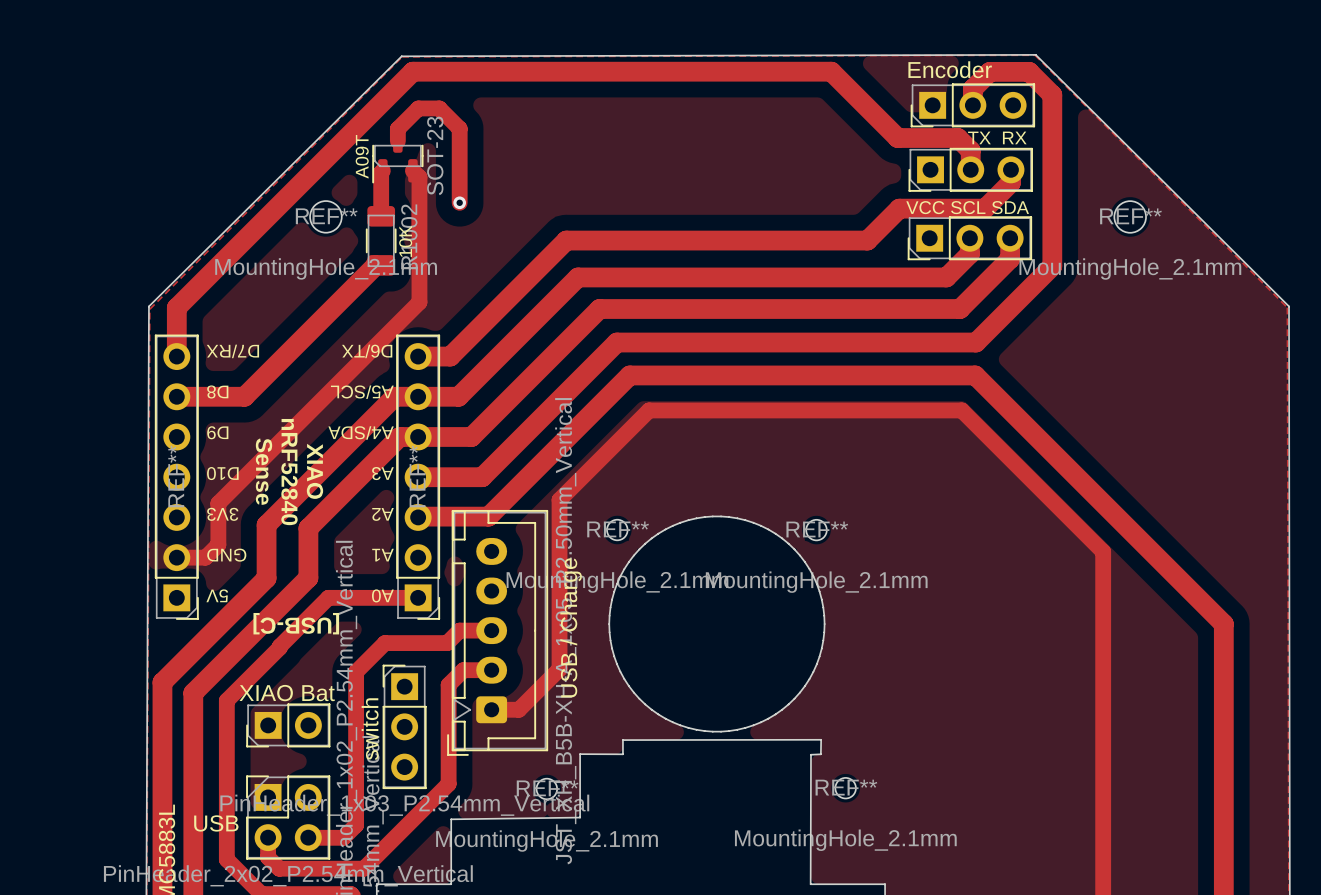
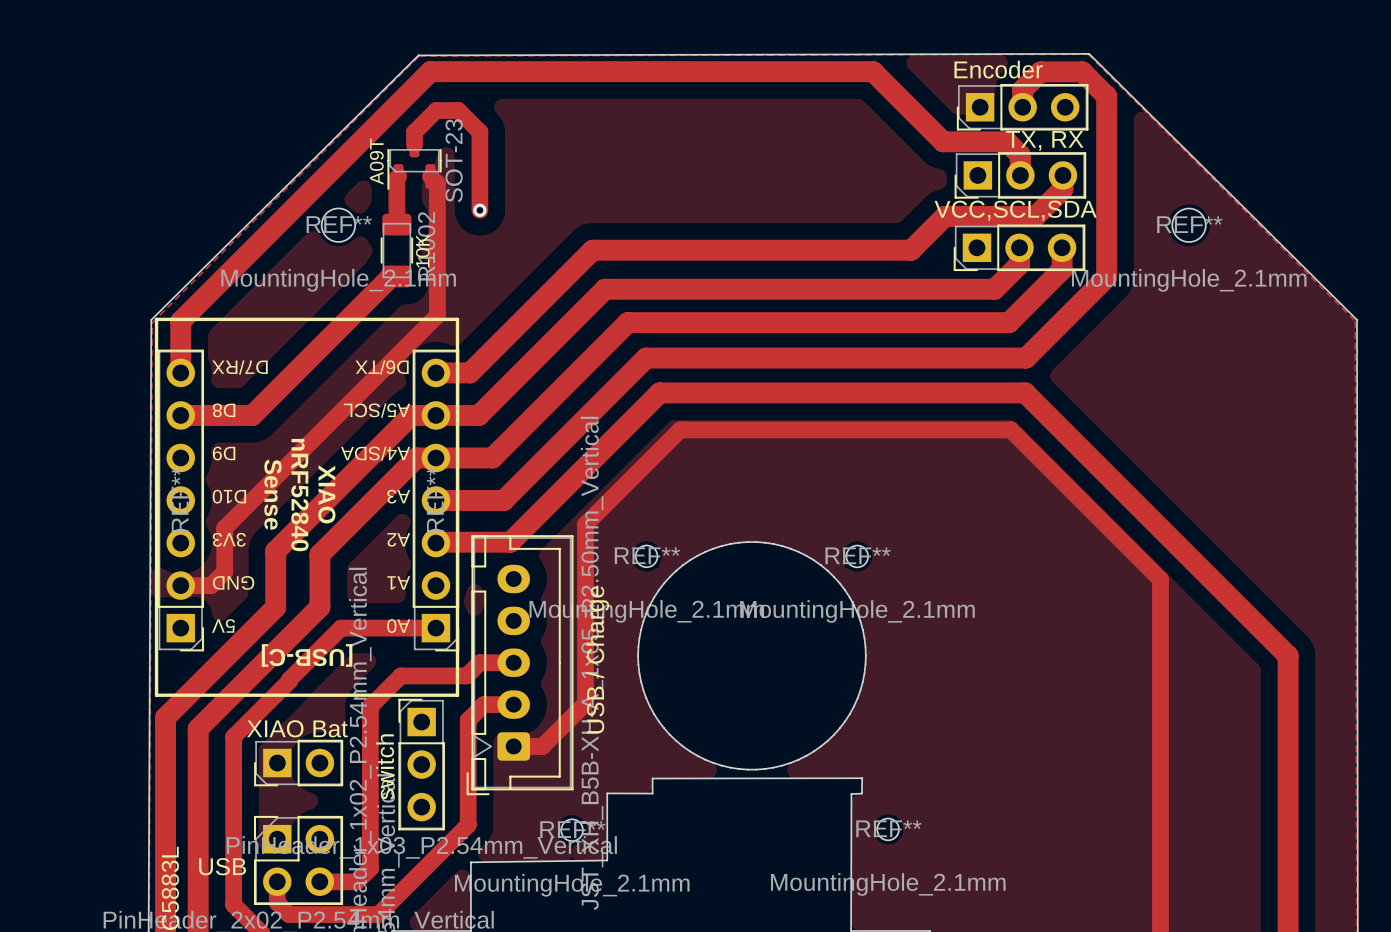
part value: TX RX (997, 137) -> TX, RX (1044, 140)
part value: VCC SCL SDA (967, 207) -> VCC,SCL,SDA (1015, 210)
line: none -> (156, 319) (457, 319) (457, 695) (156, 695) (156, 319)

